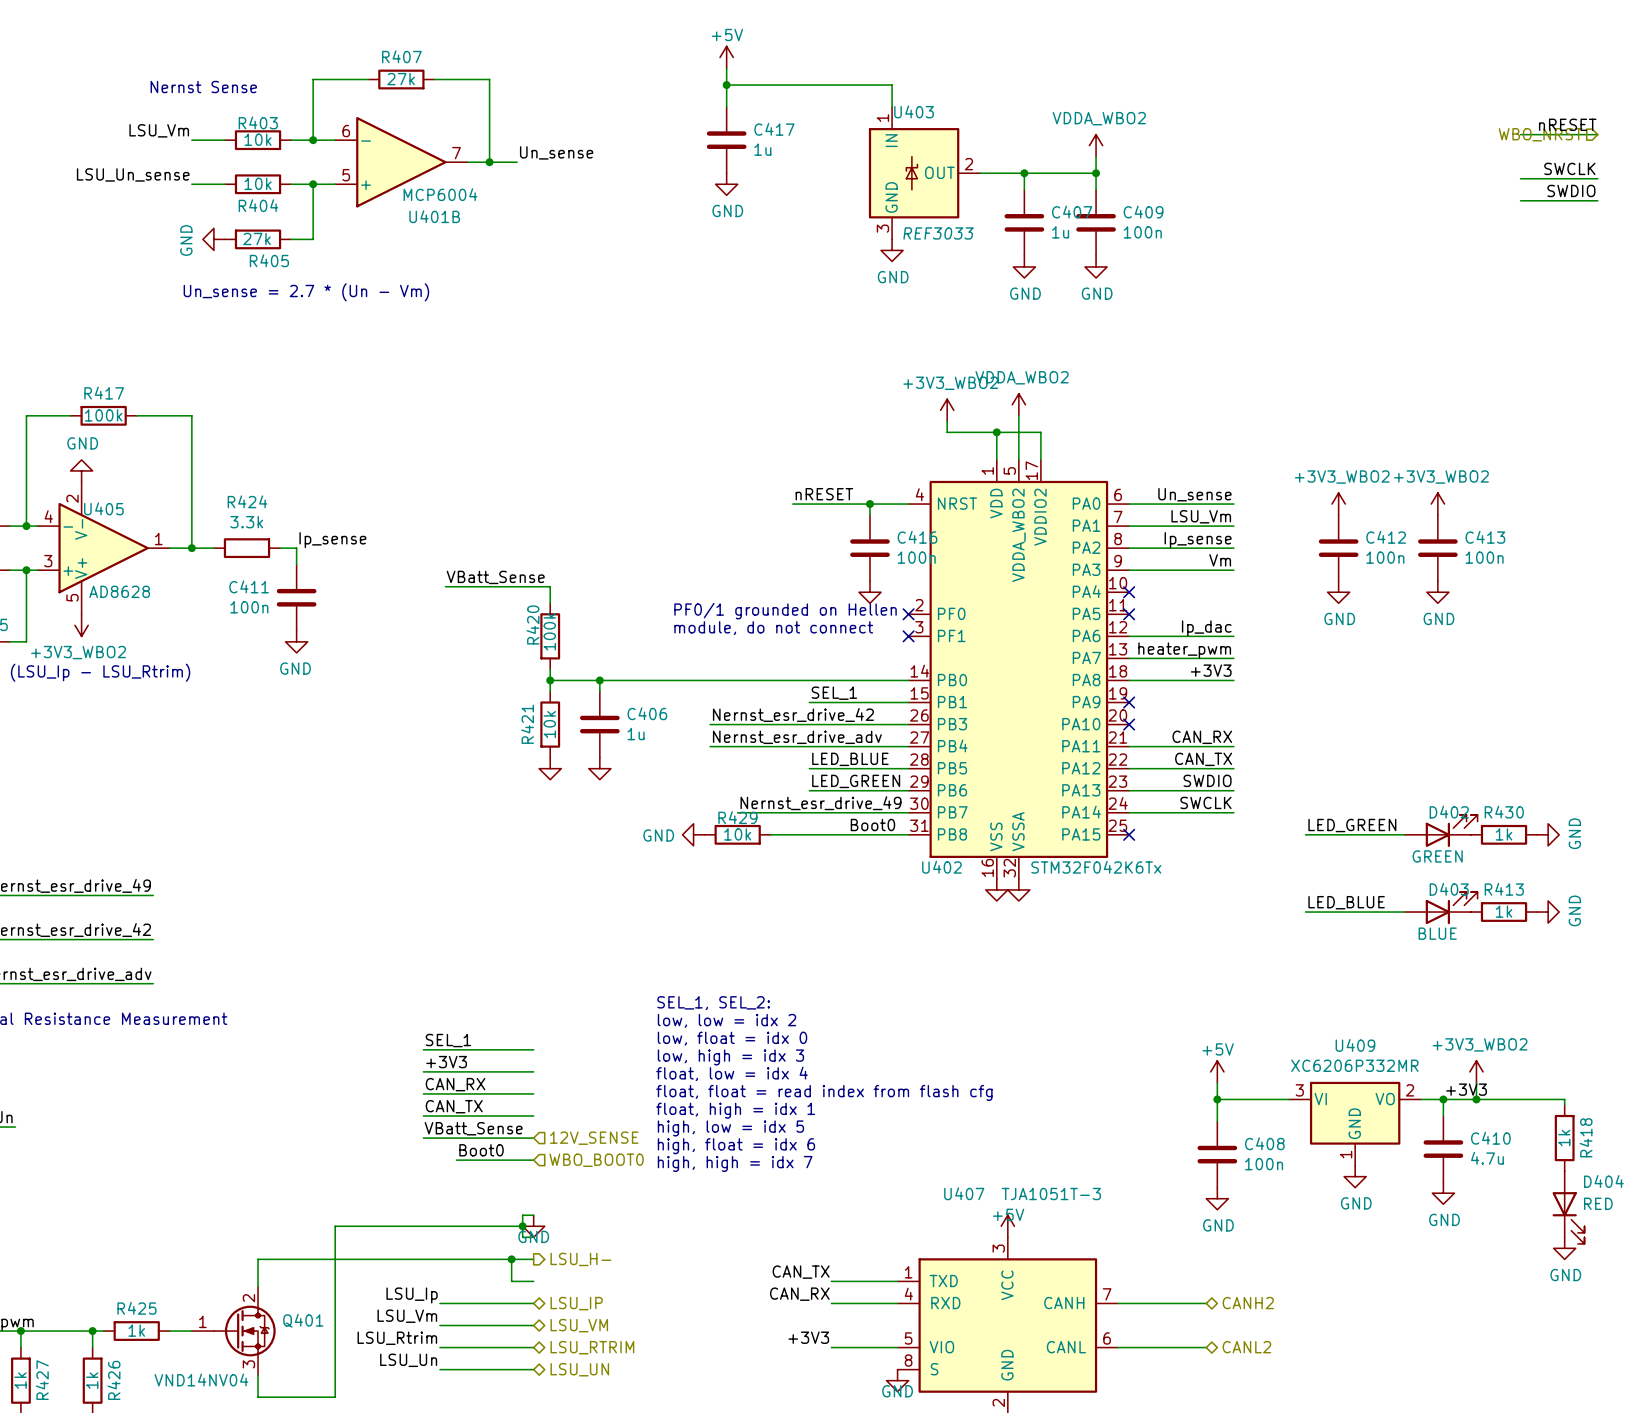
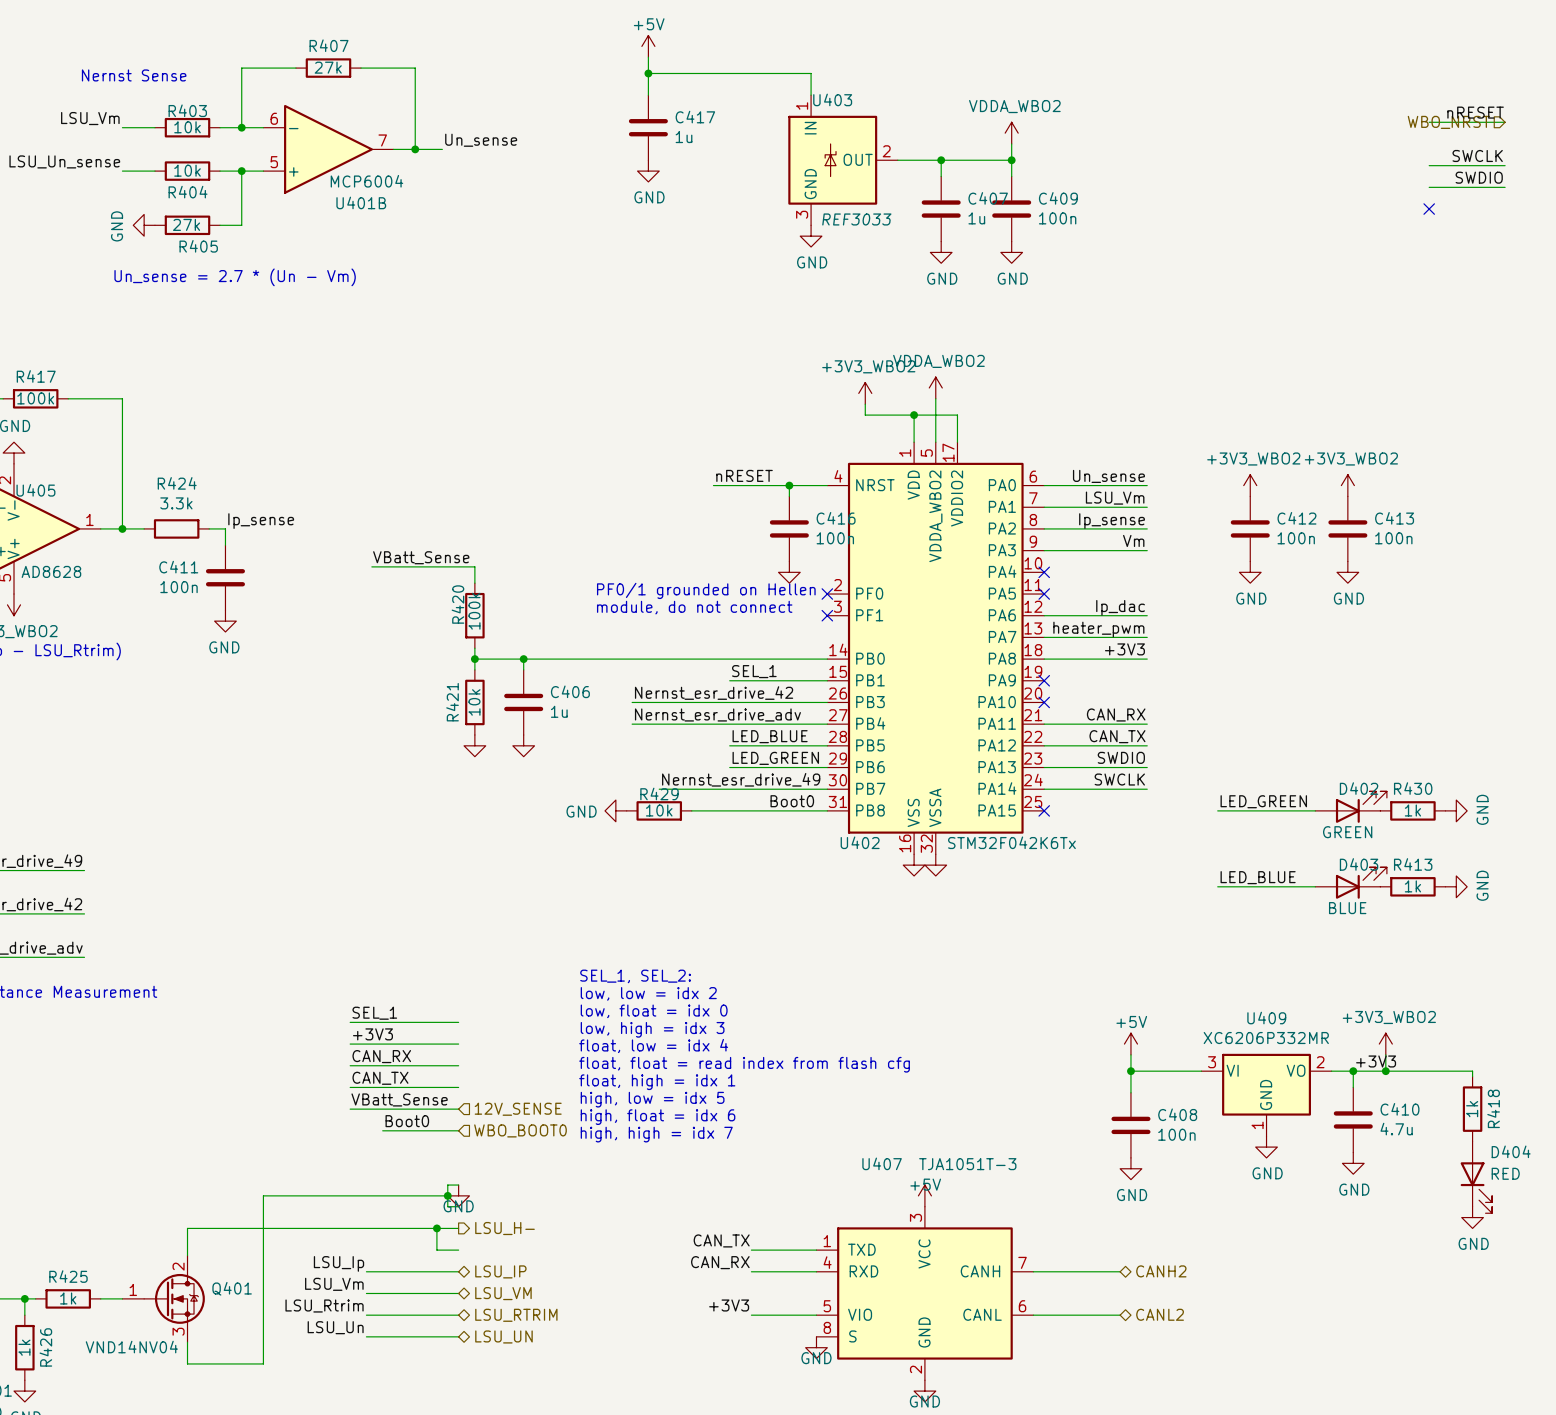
no-connect mark: none -> (1429, 209)

